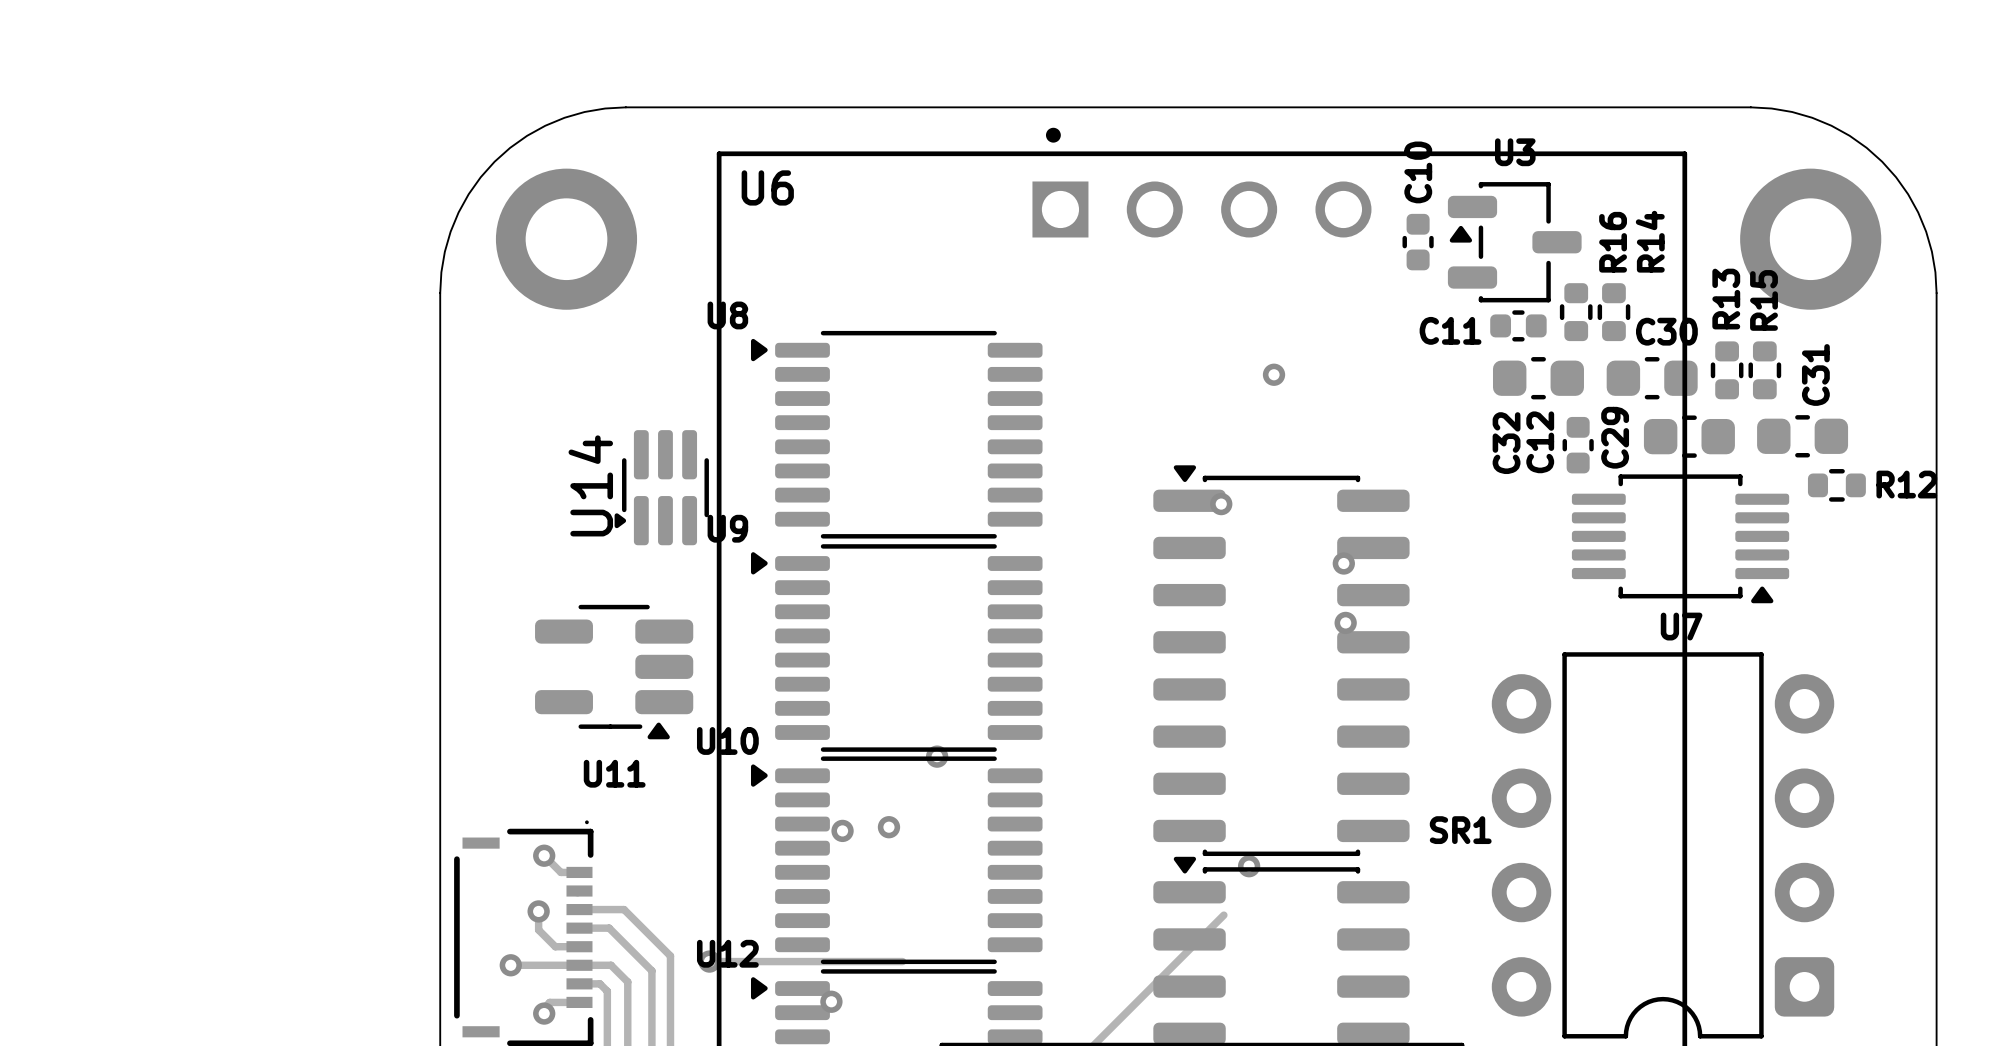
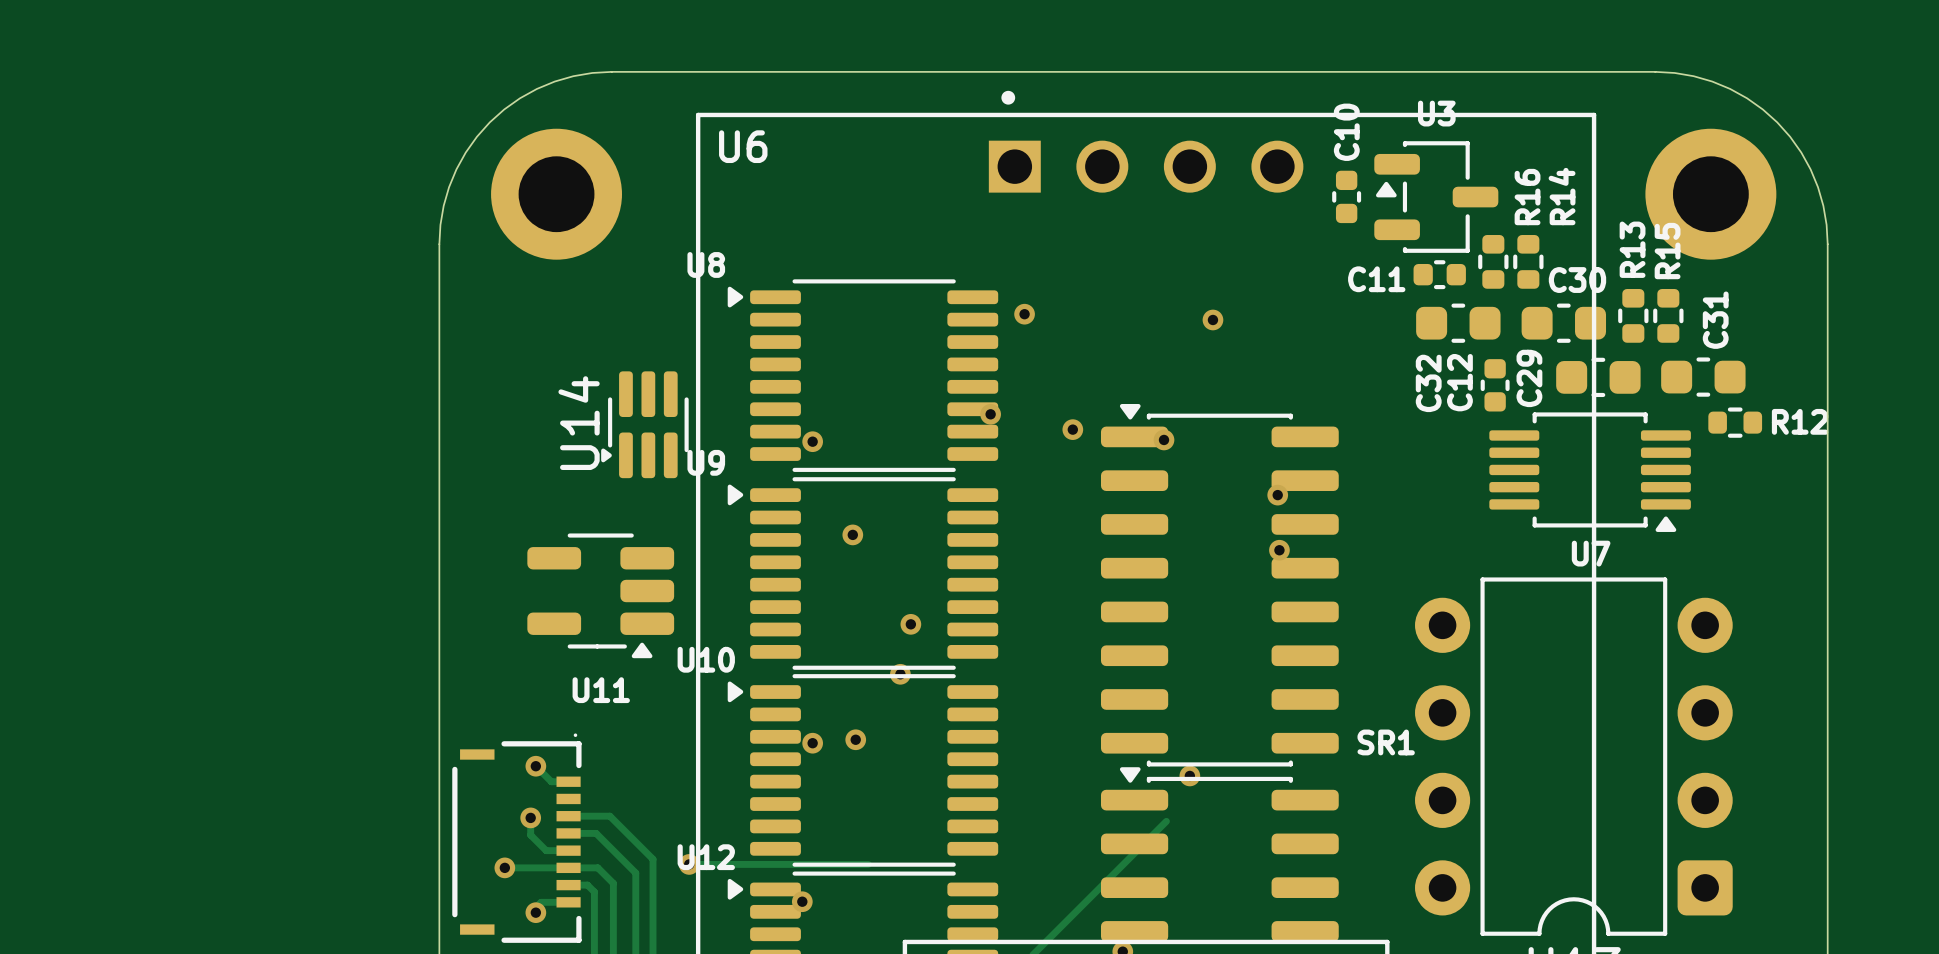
via: none -> (1024, 314)
via: none -> (990, 414)
via: none -> (1072, 429)
via: none -> (812, 441)
via: none -> (852, 534)
via: none -> (910, 624)

